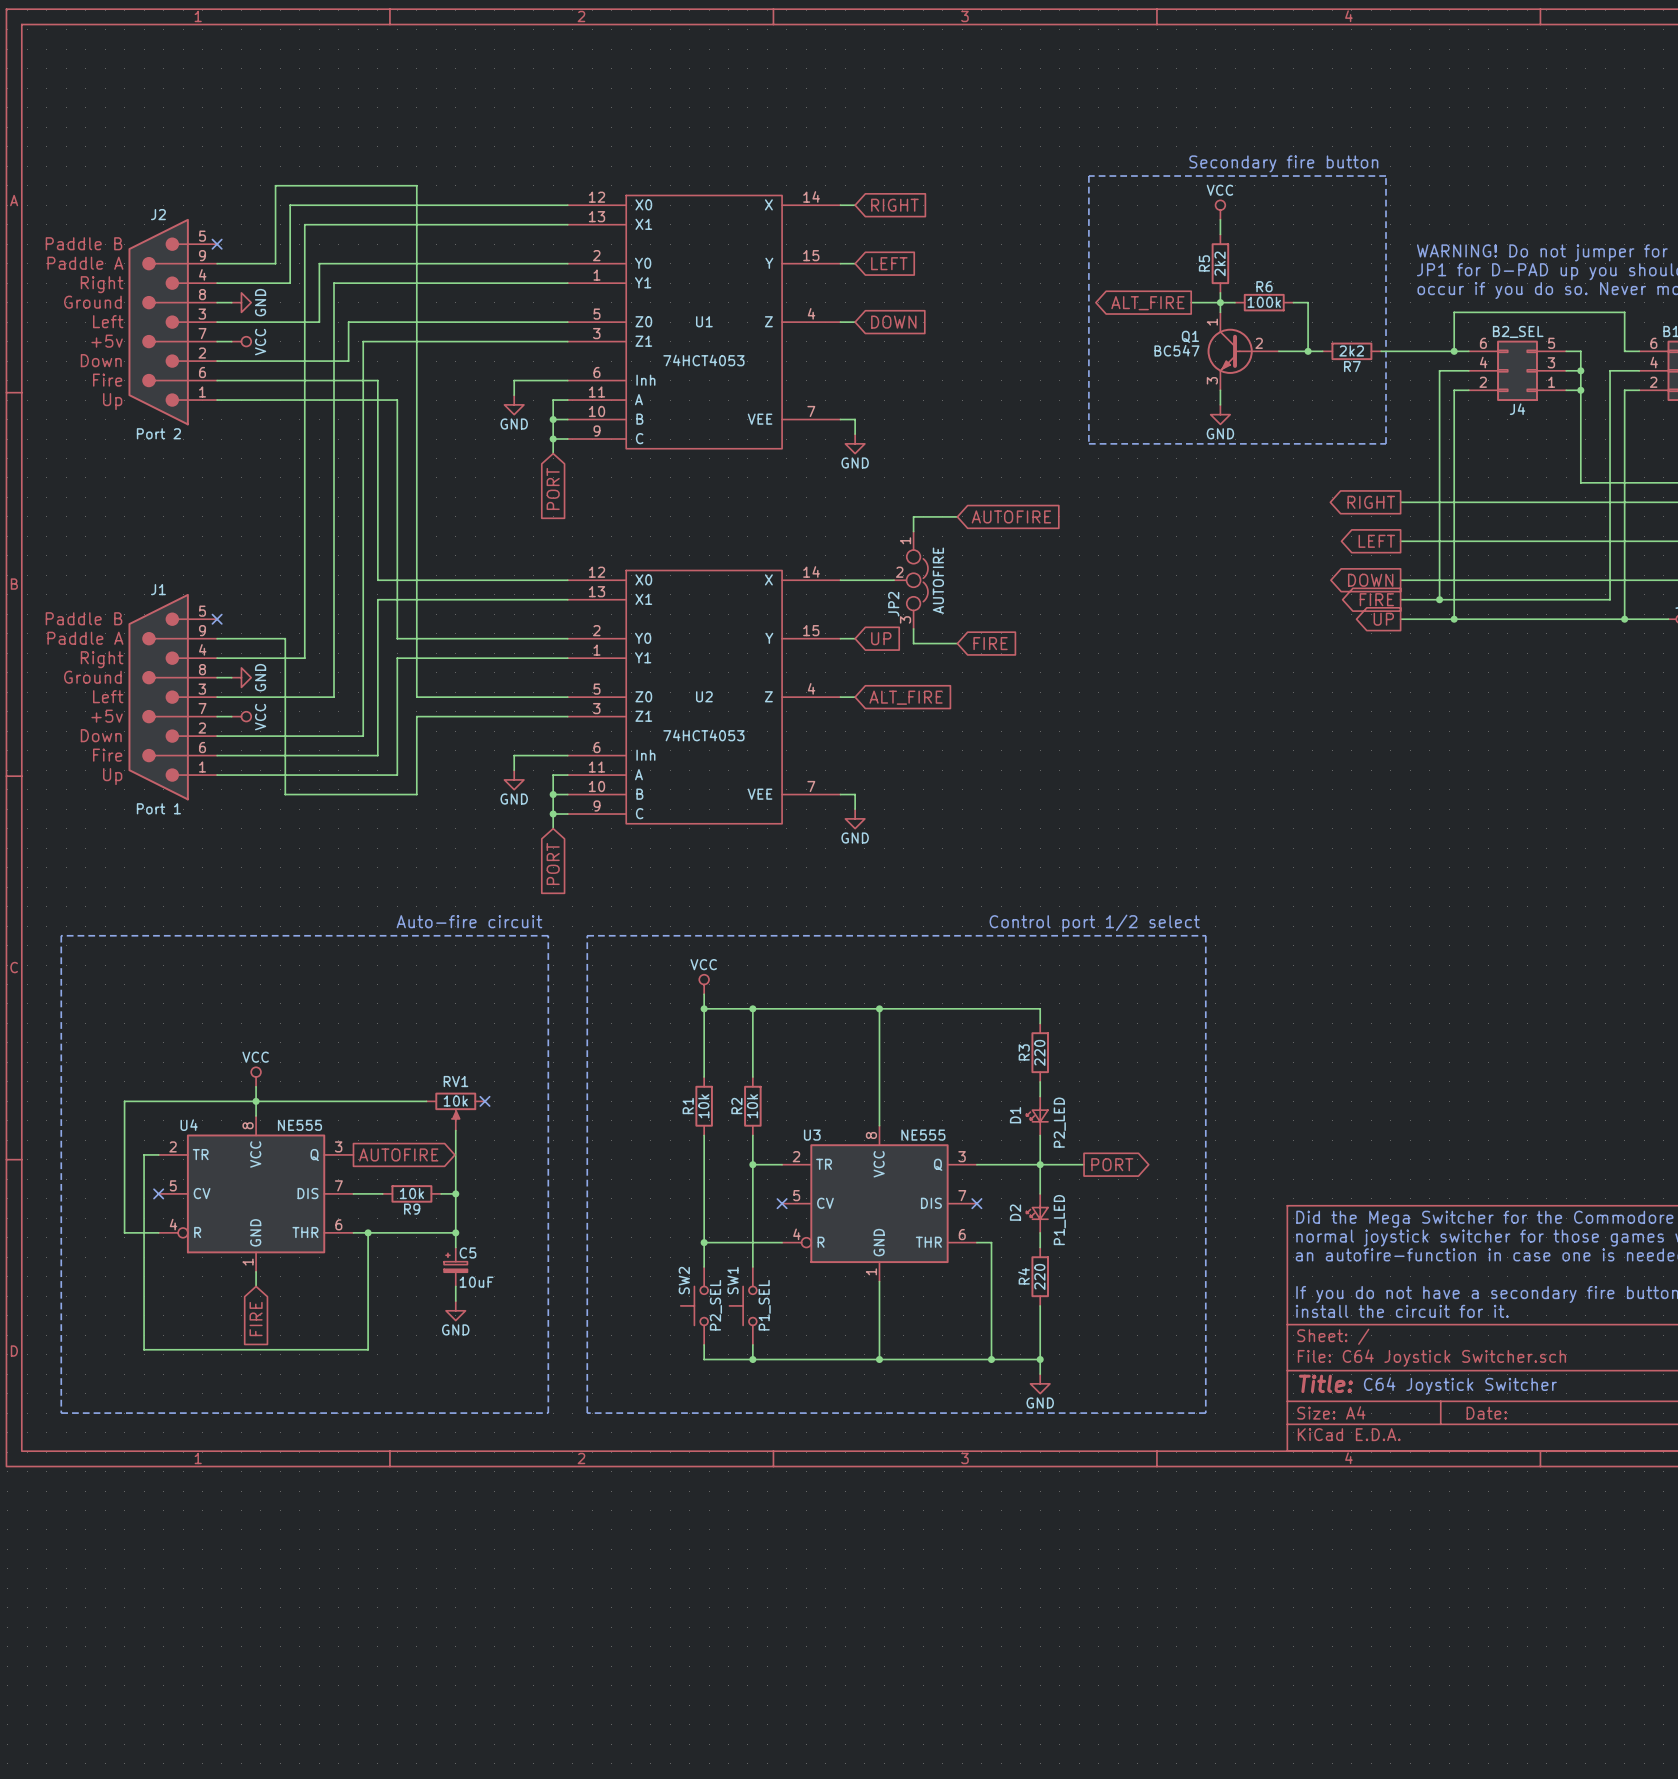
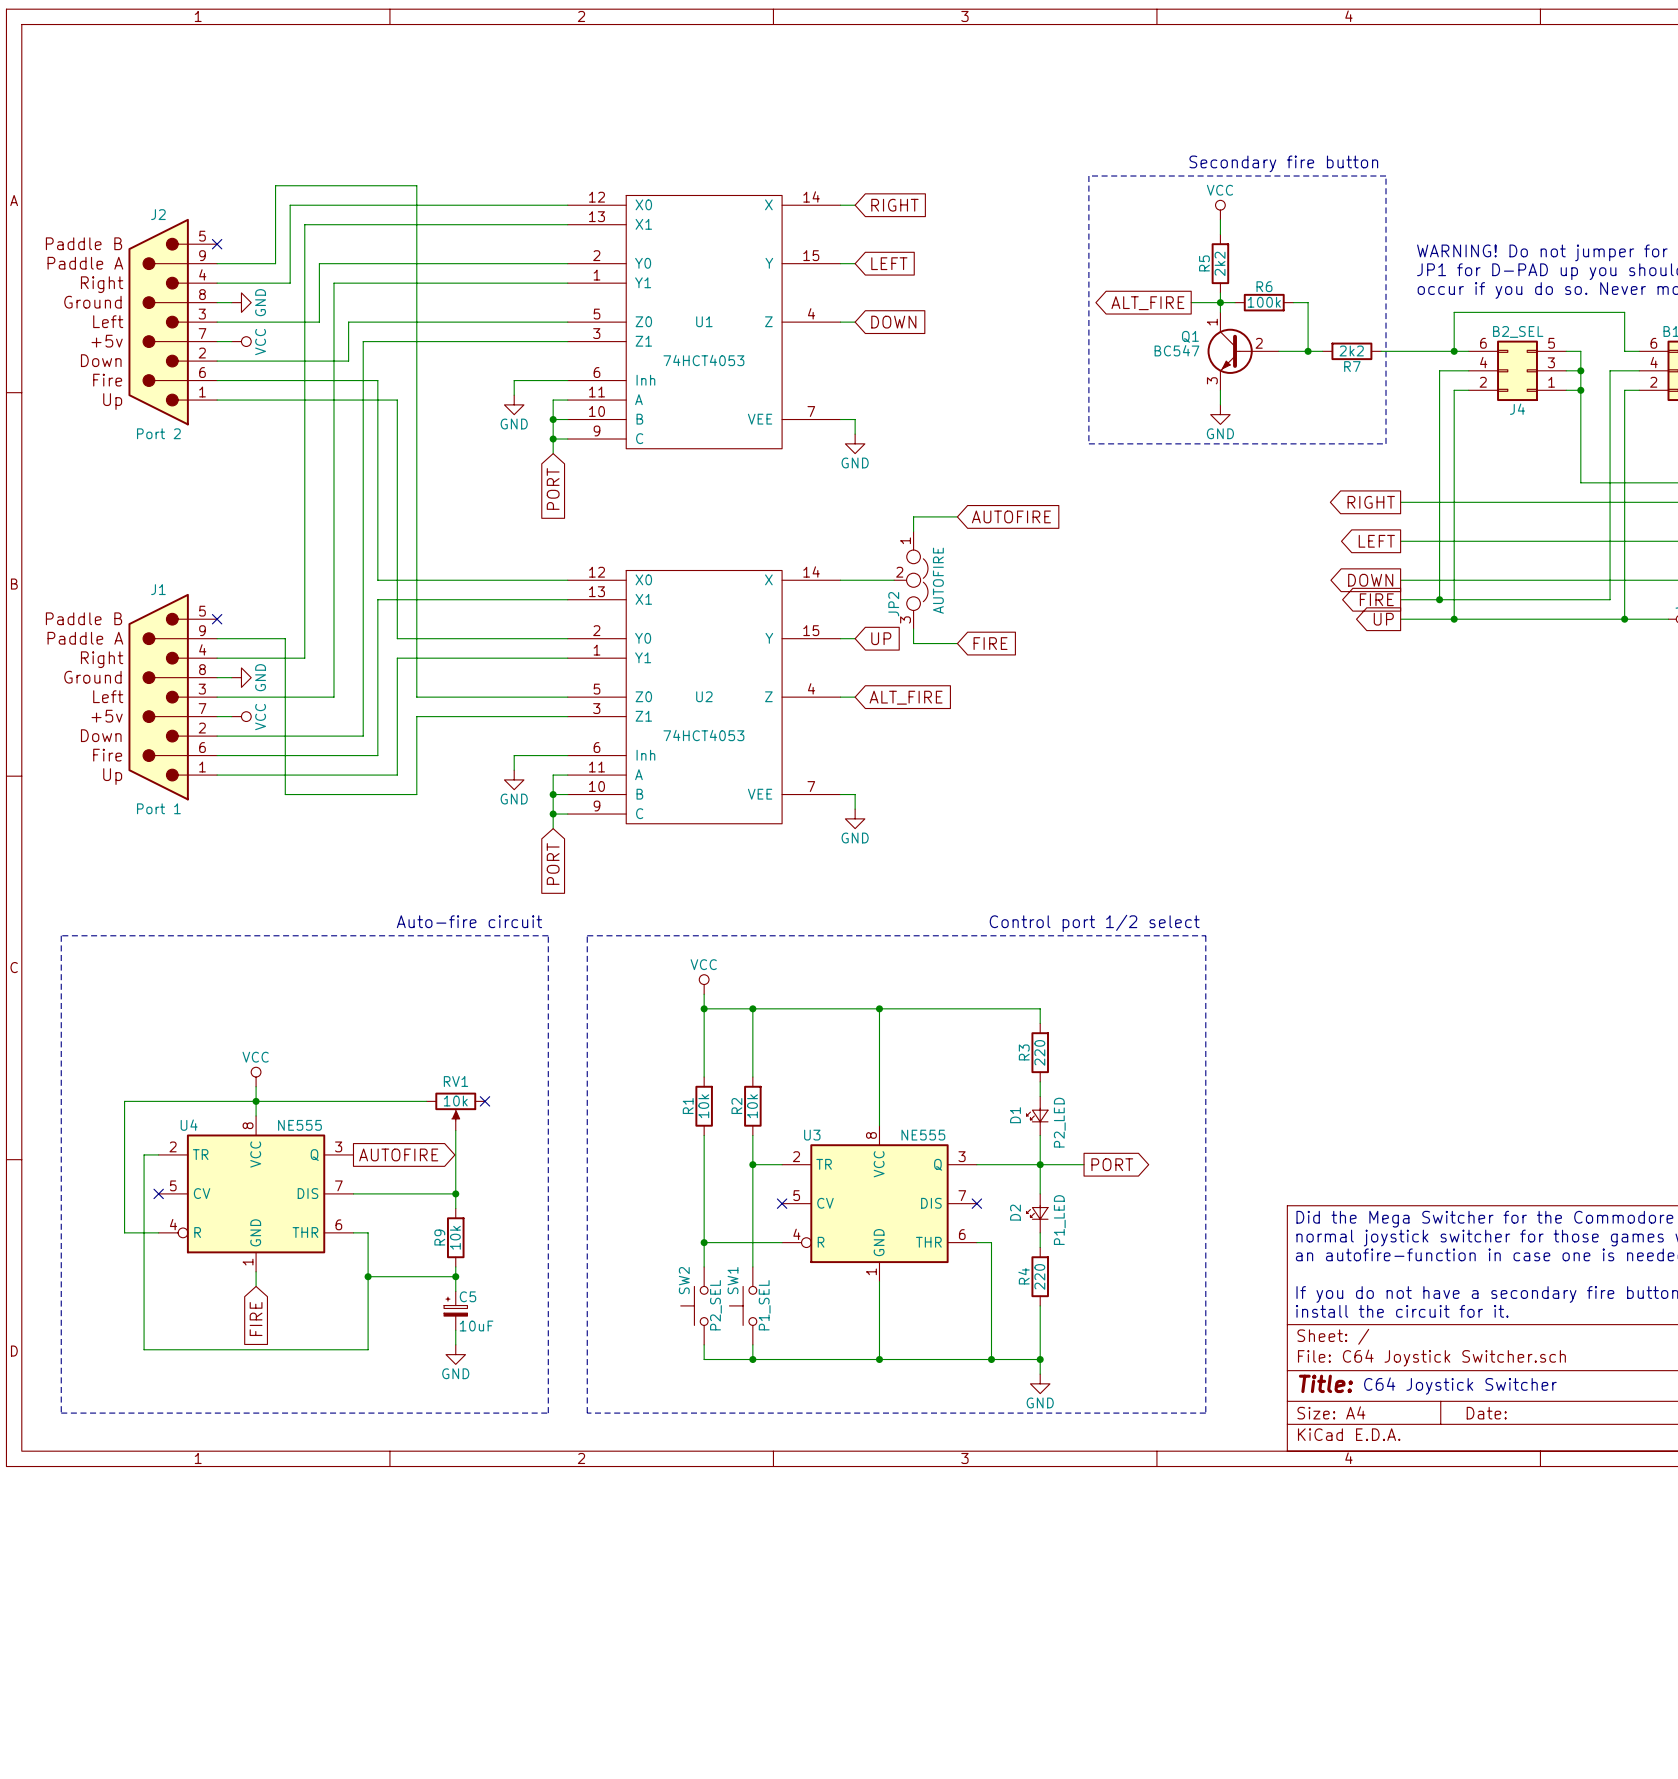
wire: none -> (382, 1193) (441, 1193)
R9 rotation: 0° (411, 1193) -> 90° clockwise (455, 1237)
R9 position: (411, 1193) -> (455, 1237)
wire: (455, 1208) (455, 1247) -> none
wire: (368, 1232) (455, 1232) -> (368, 1276) (455, 1276)
junction position: (368, 1232) -> (368, 1276)
junction position: (455, 1232) -> (455, 1276)
C5 position: (455, 1266) -> (455, 1310)
power symbol position: GND (455, 1310) -> GND (455, 1354)
wire: none -> (455, 1330) (455, 1344)

